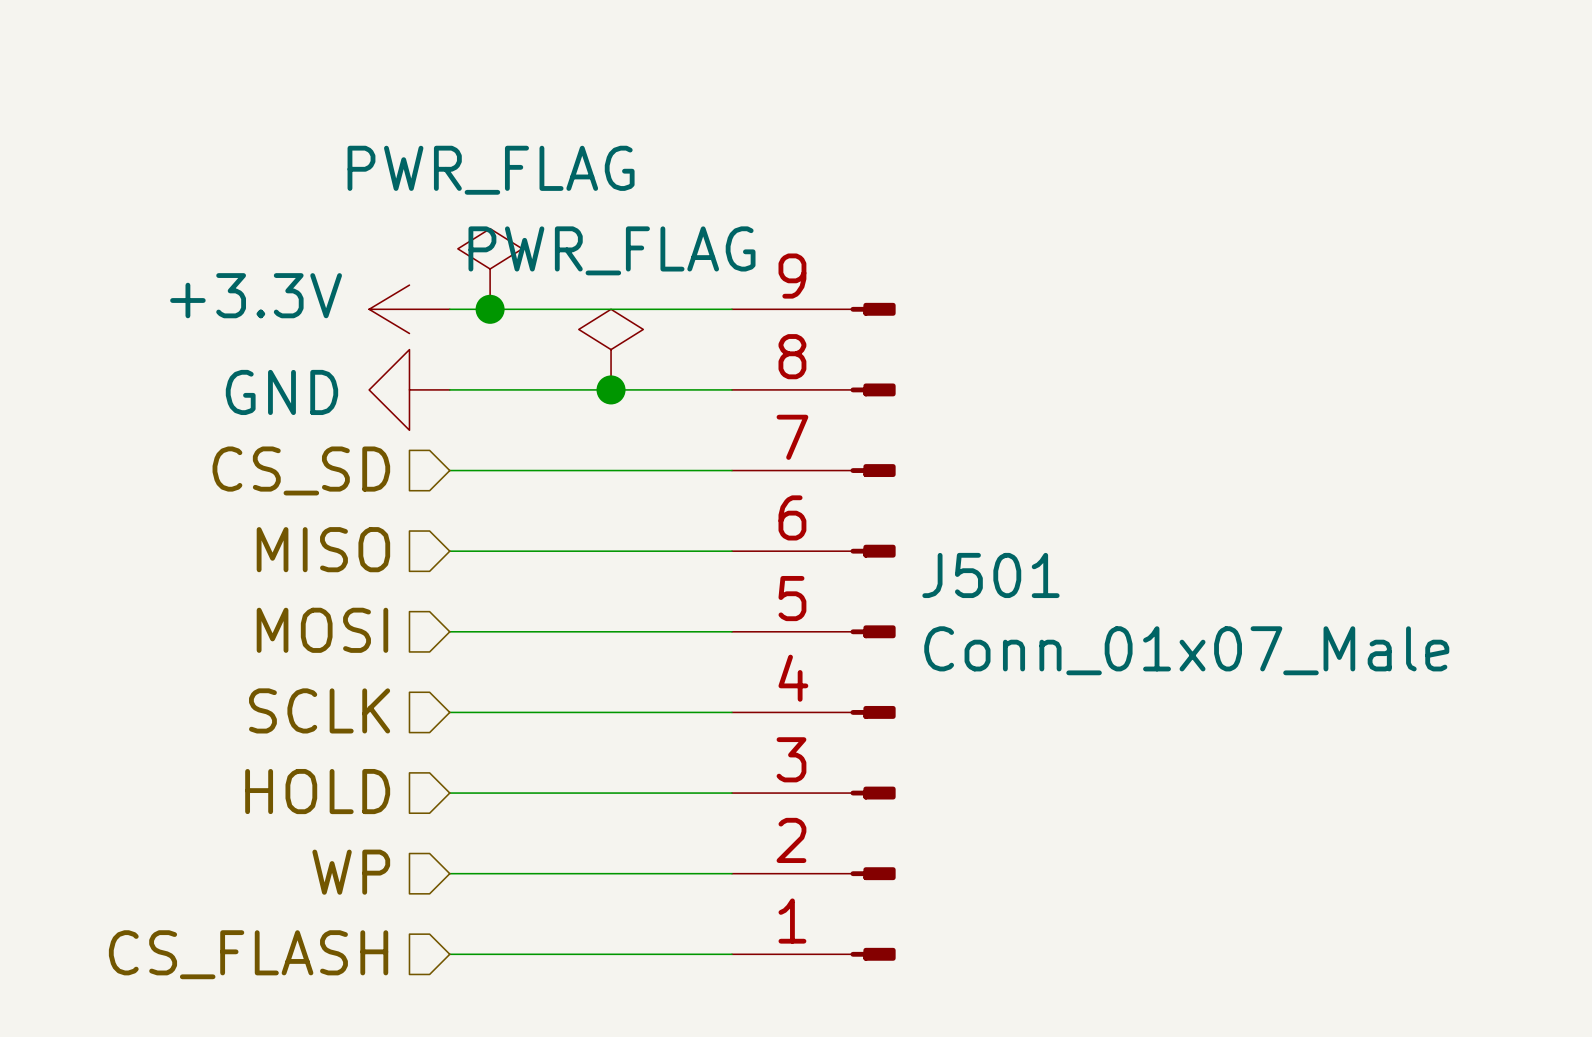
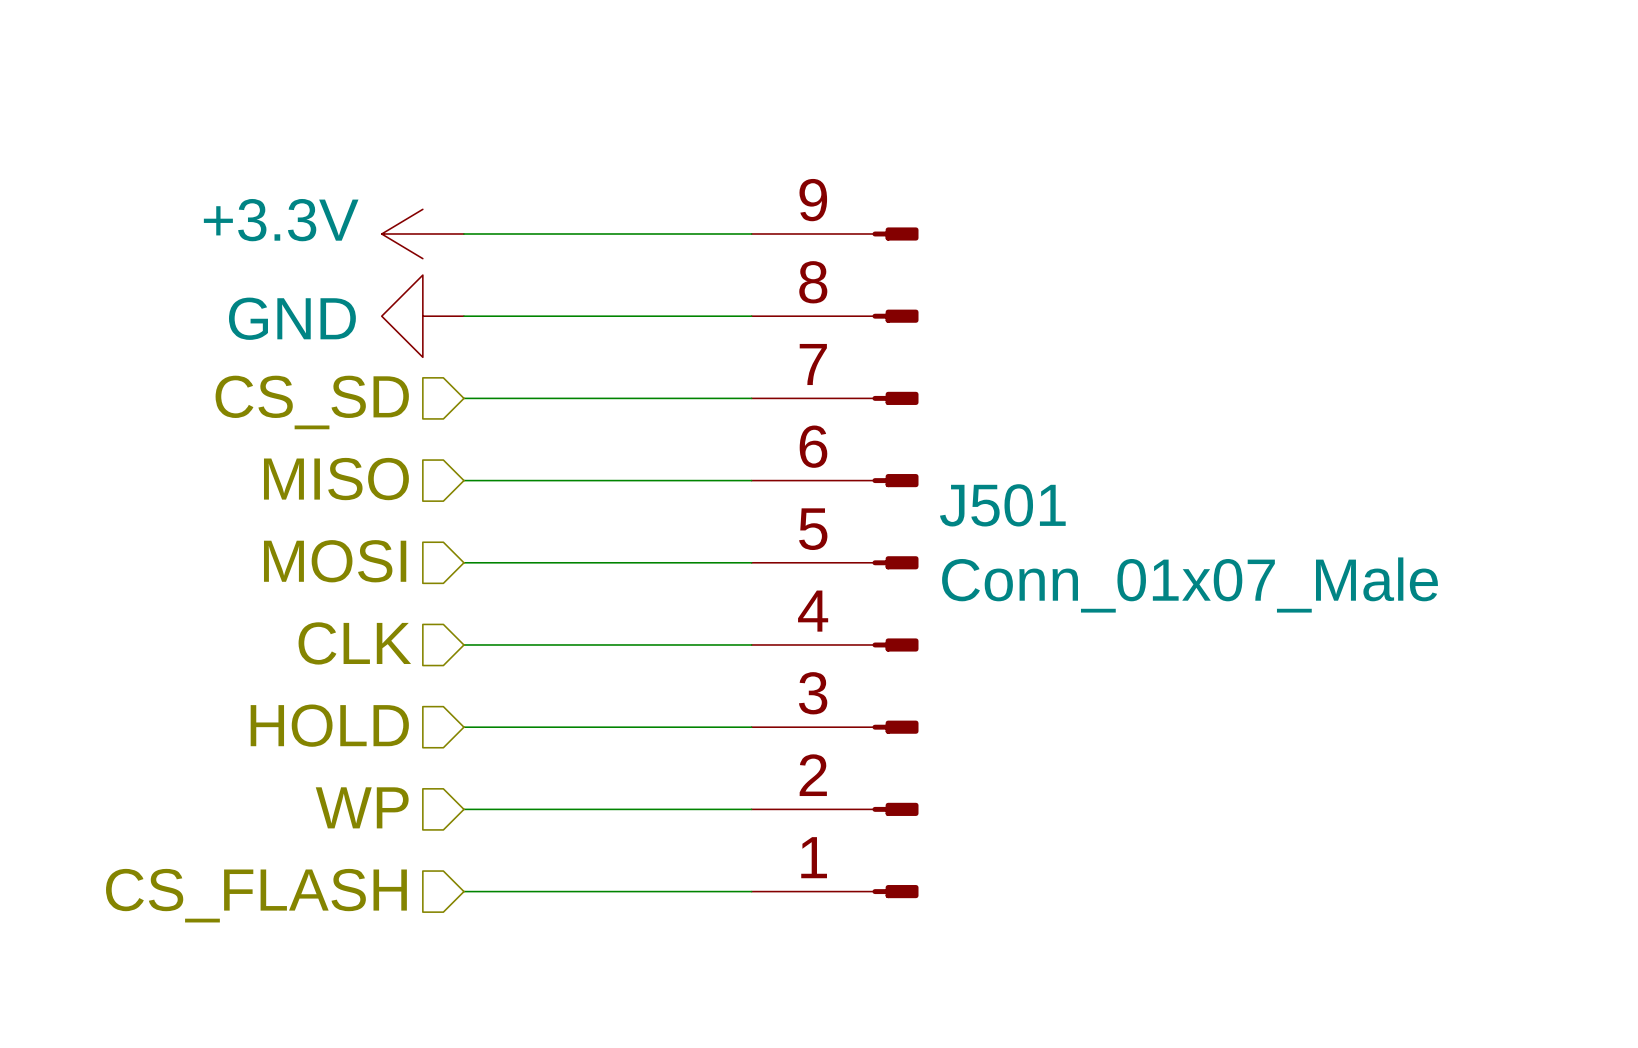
power symbol: PWR_FLAG (490, 268) -> none
junction: (490, 309) -> none
power symbol: PWR_FLAG (611, 349) -> none
junction: (611, 389) -> none
hierarchical label: SCLK (319, 710) -> CLK (354, 643)

